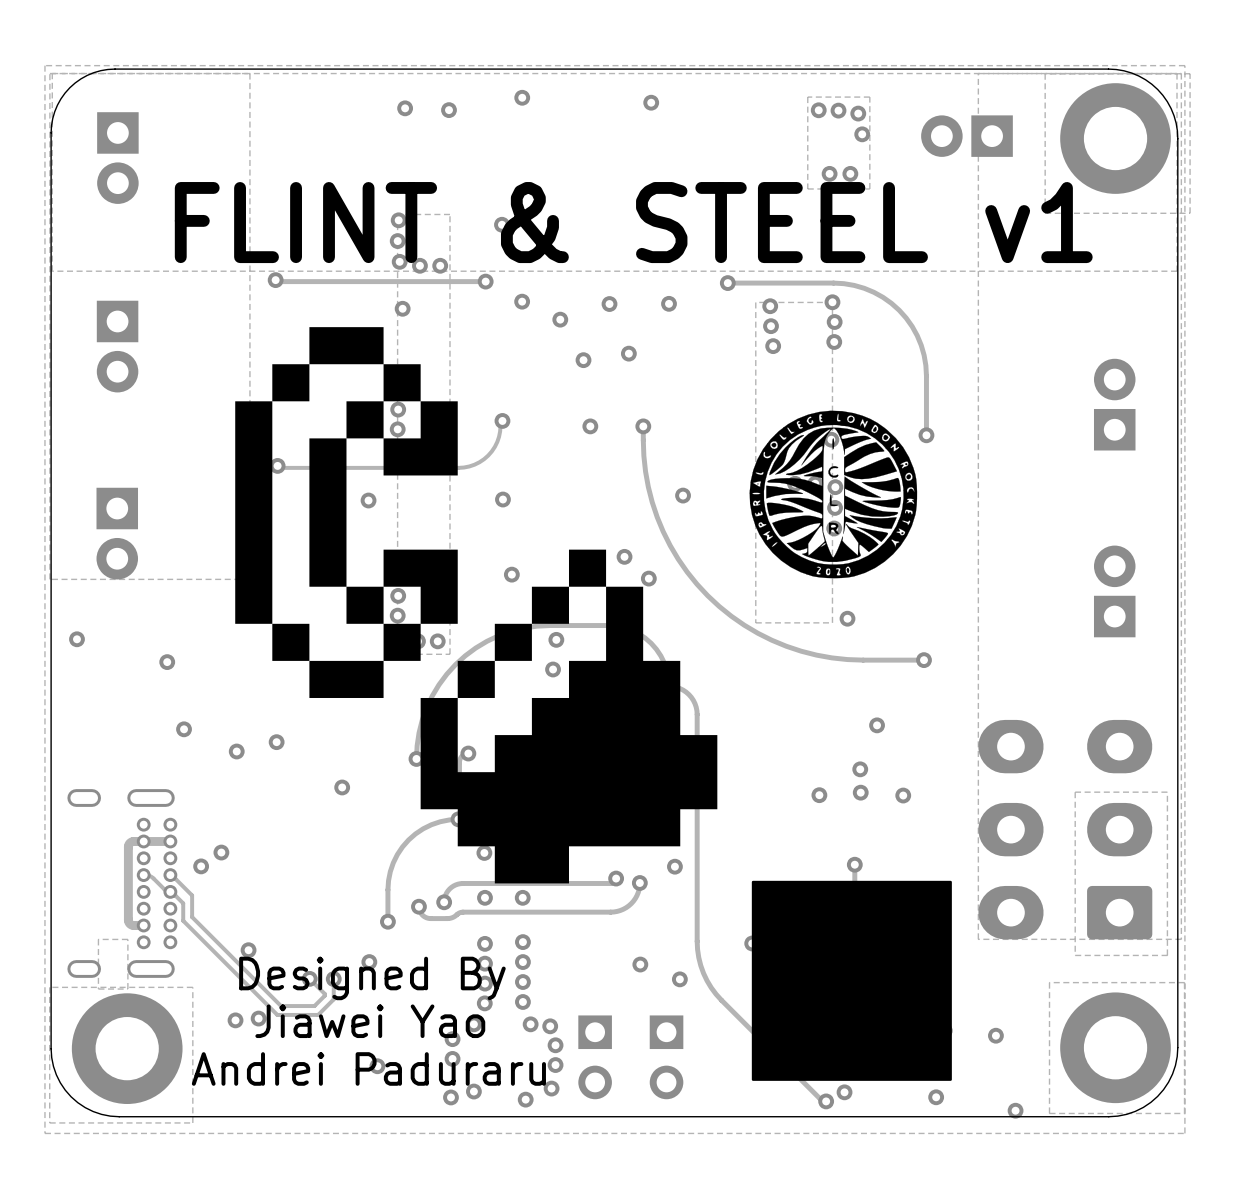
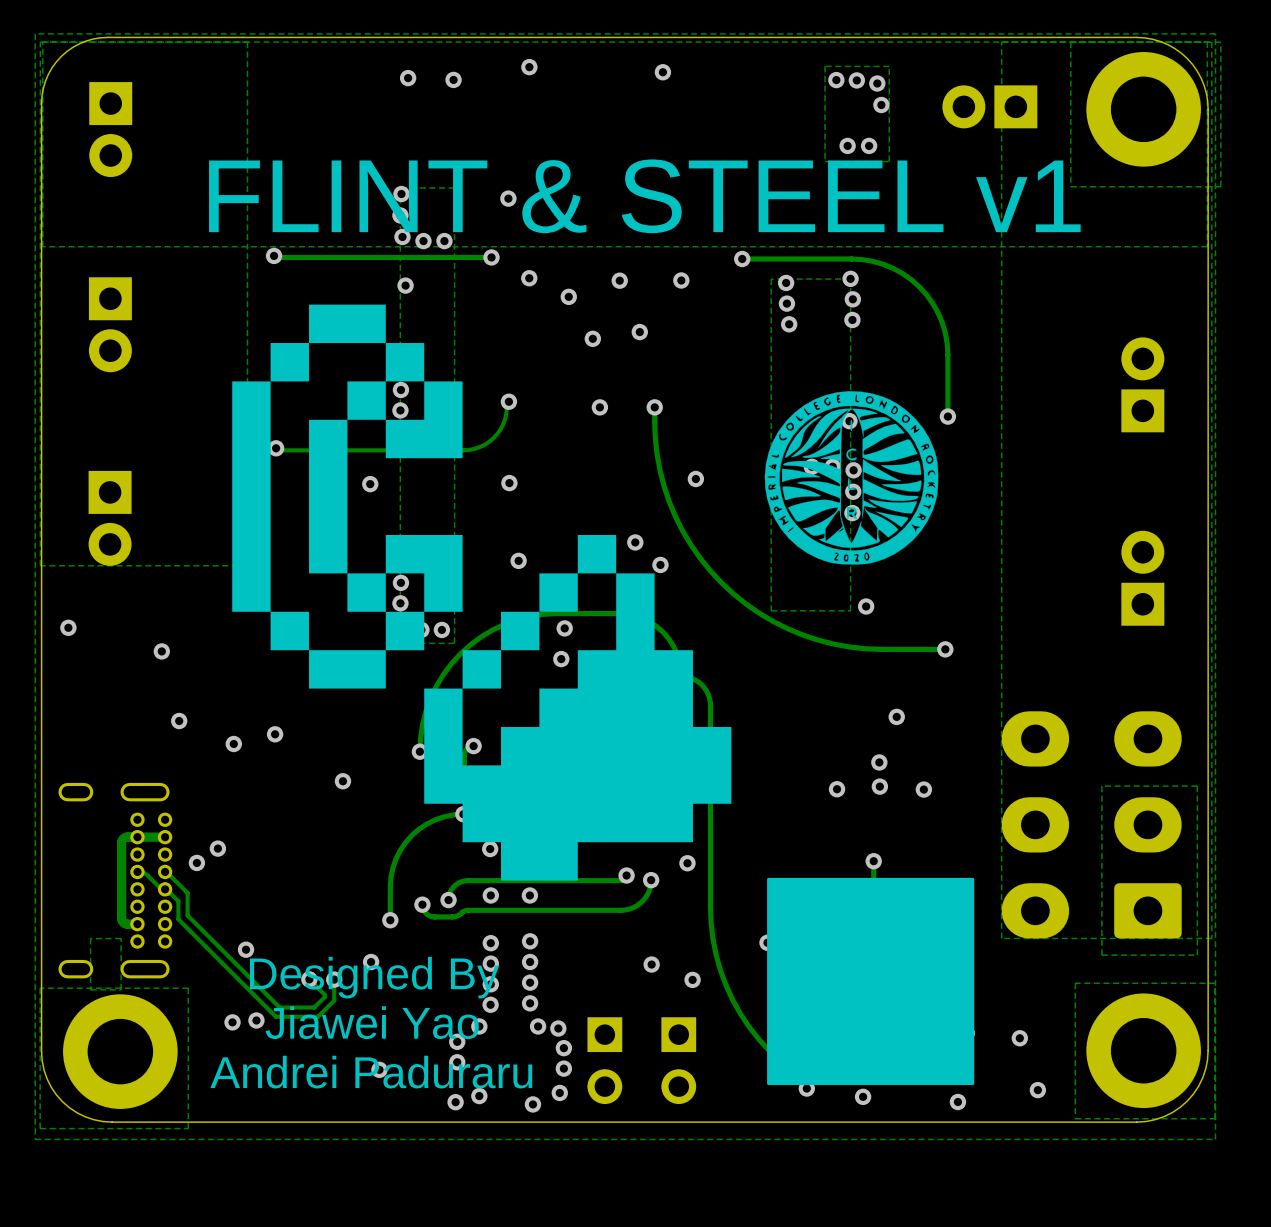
track: (697, 909) (698, 957) (703, 973) (711, 987) (820, 1098) (826, 1101) -> (710, 907) (716, 955) (732, 1000) (759, 1040) (806, 1088)
via position: (826, 1101) -> (806, 1088)
via position: (1015, 1110) -> (1037, 1090)

